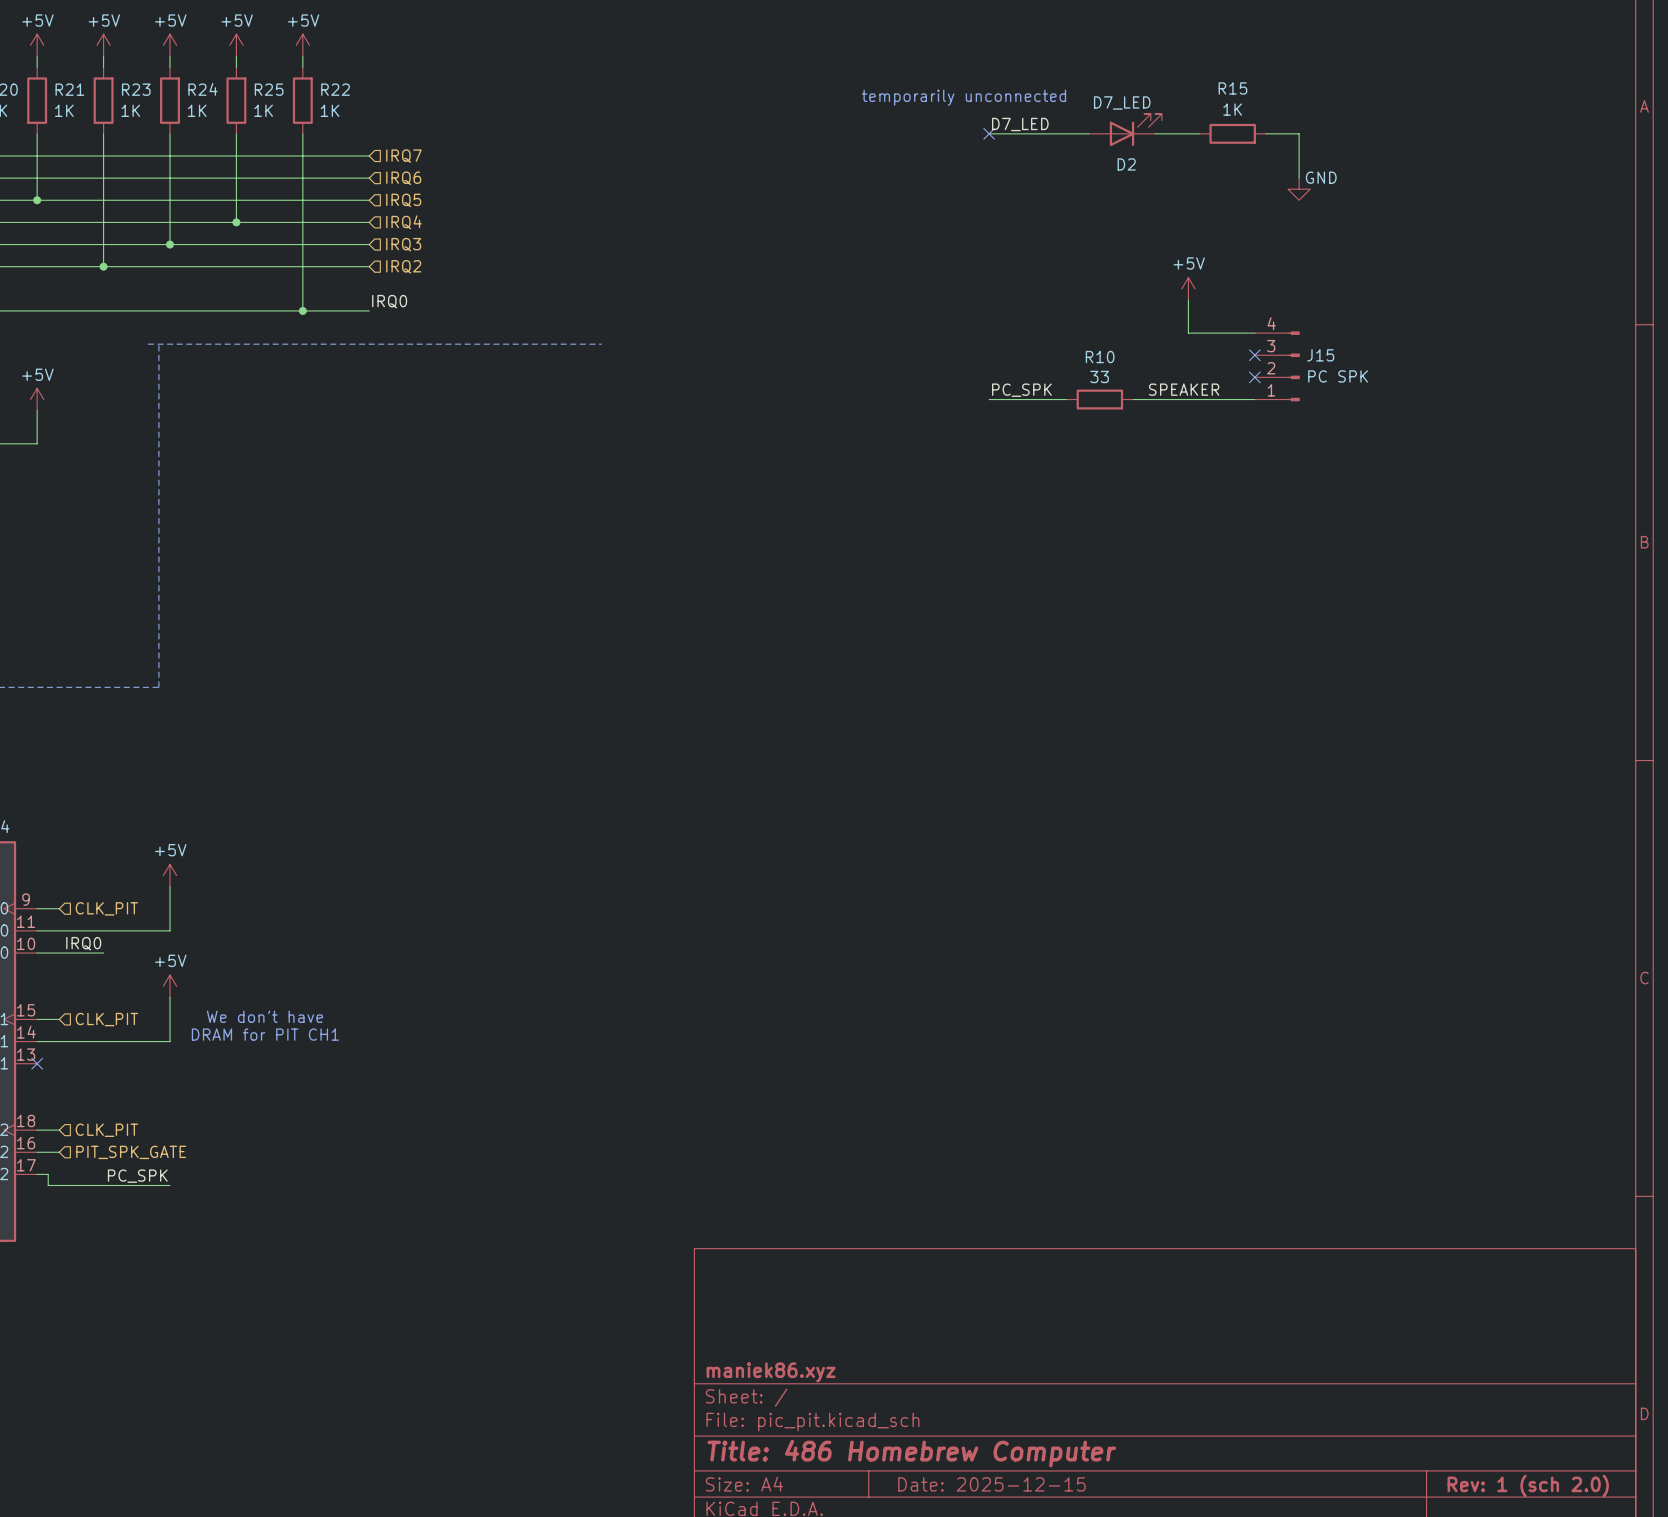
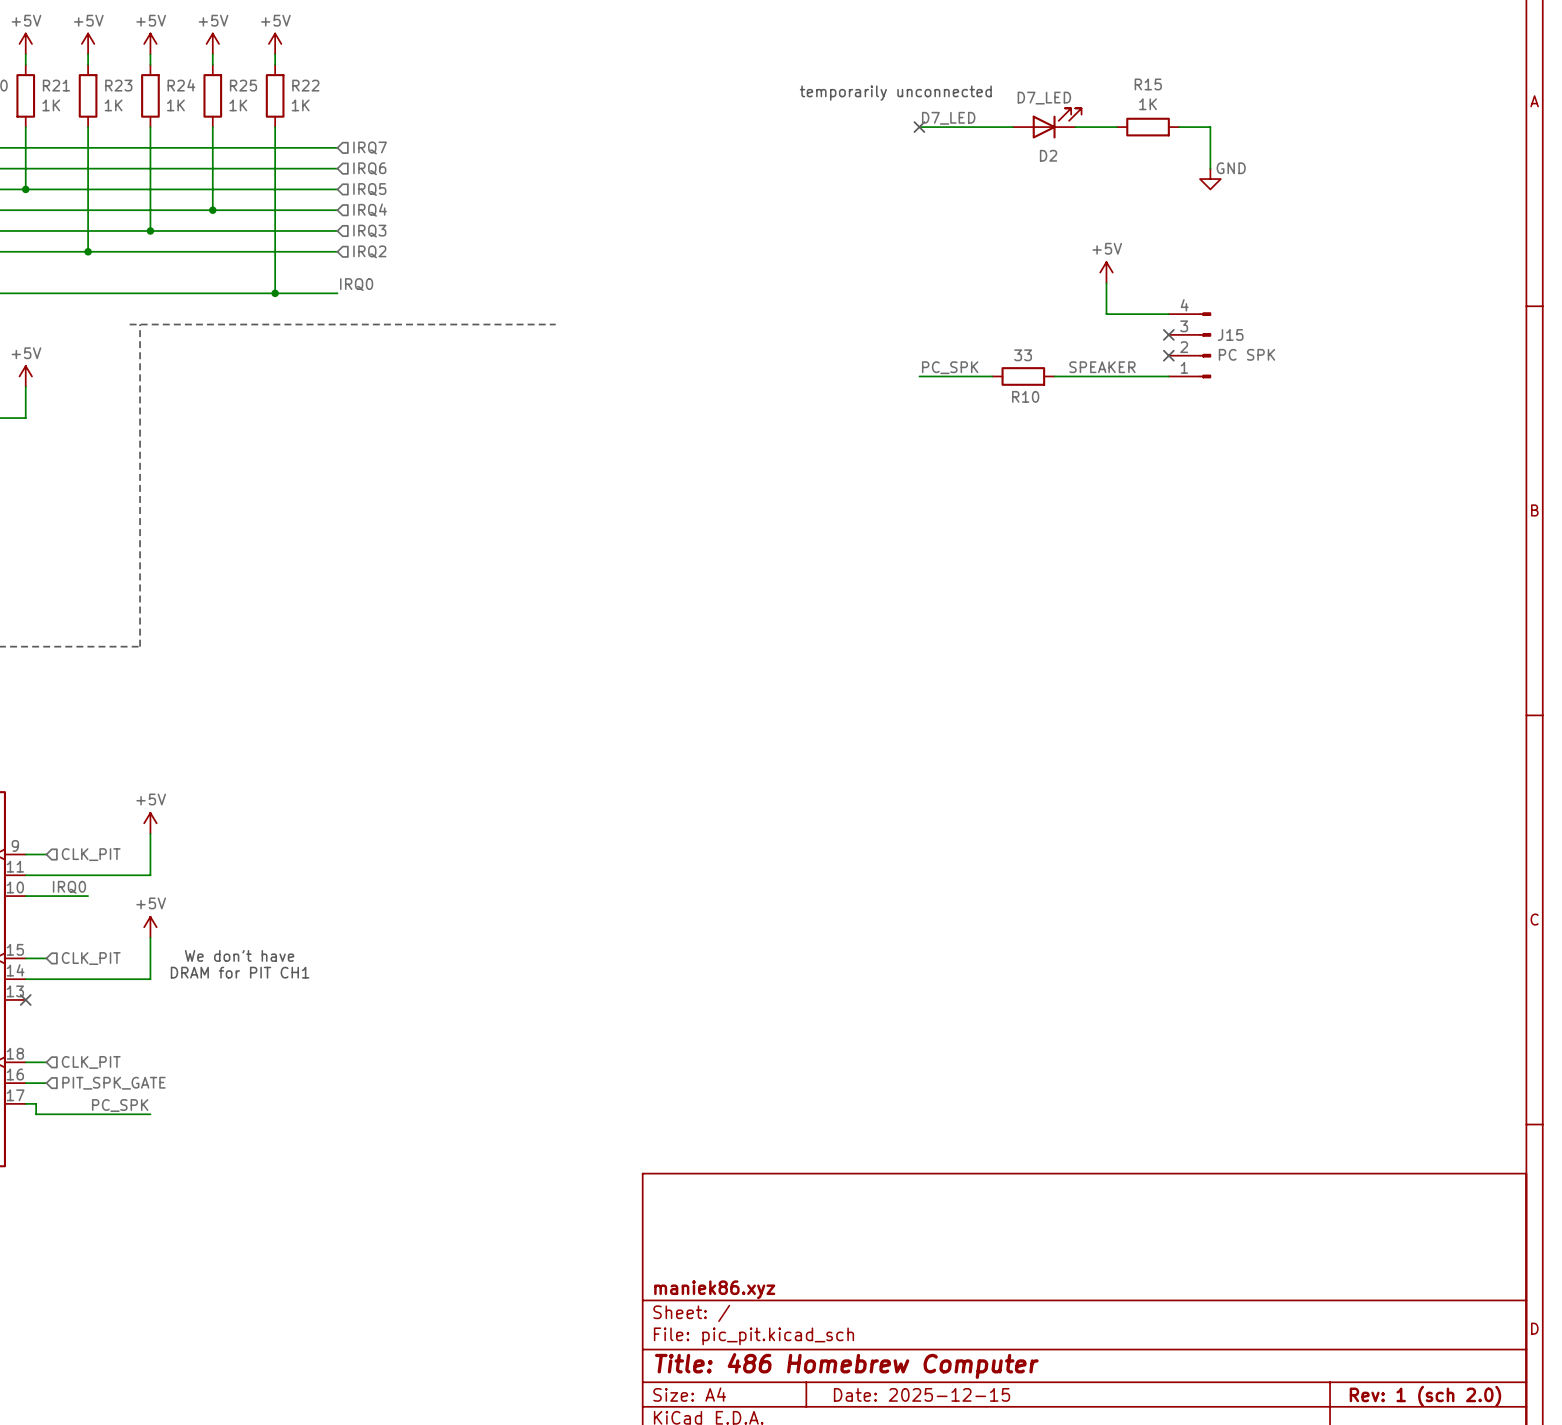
R10 name position: R10 (1100, 357) -> R10 (1025, 396)

